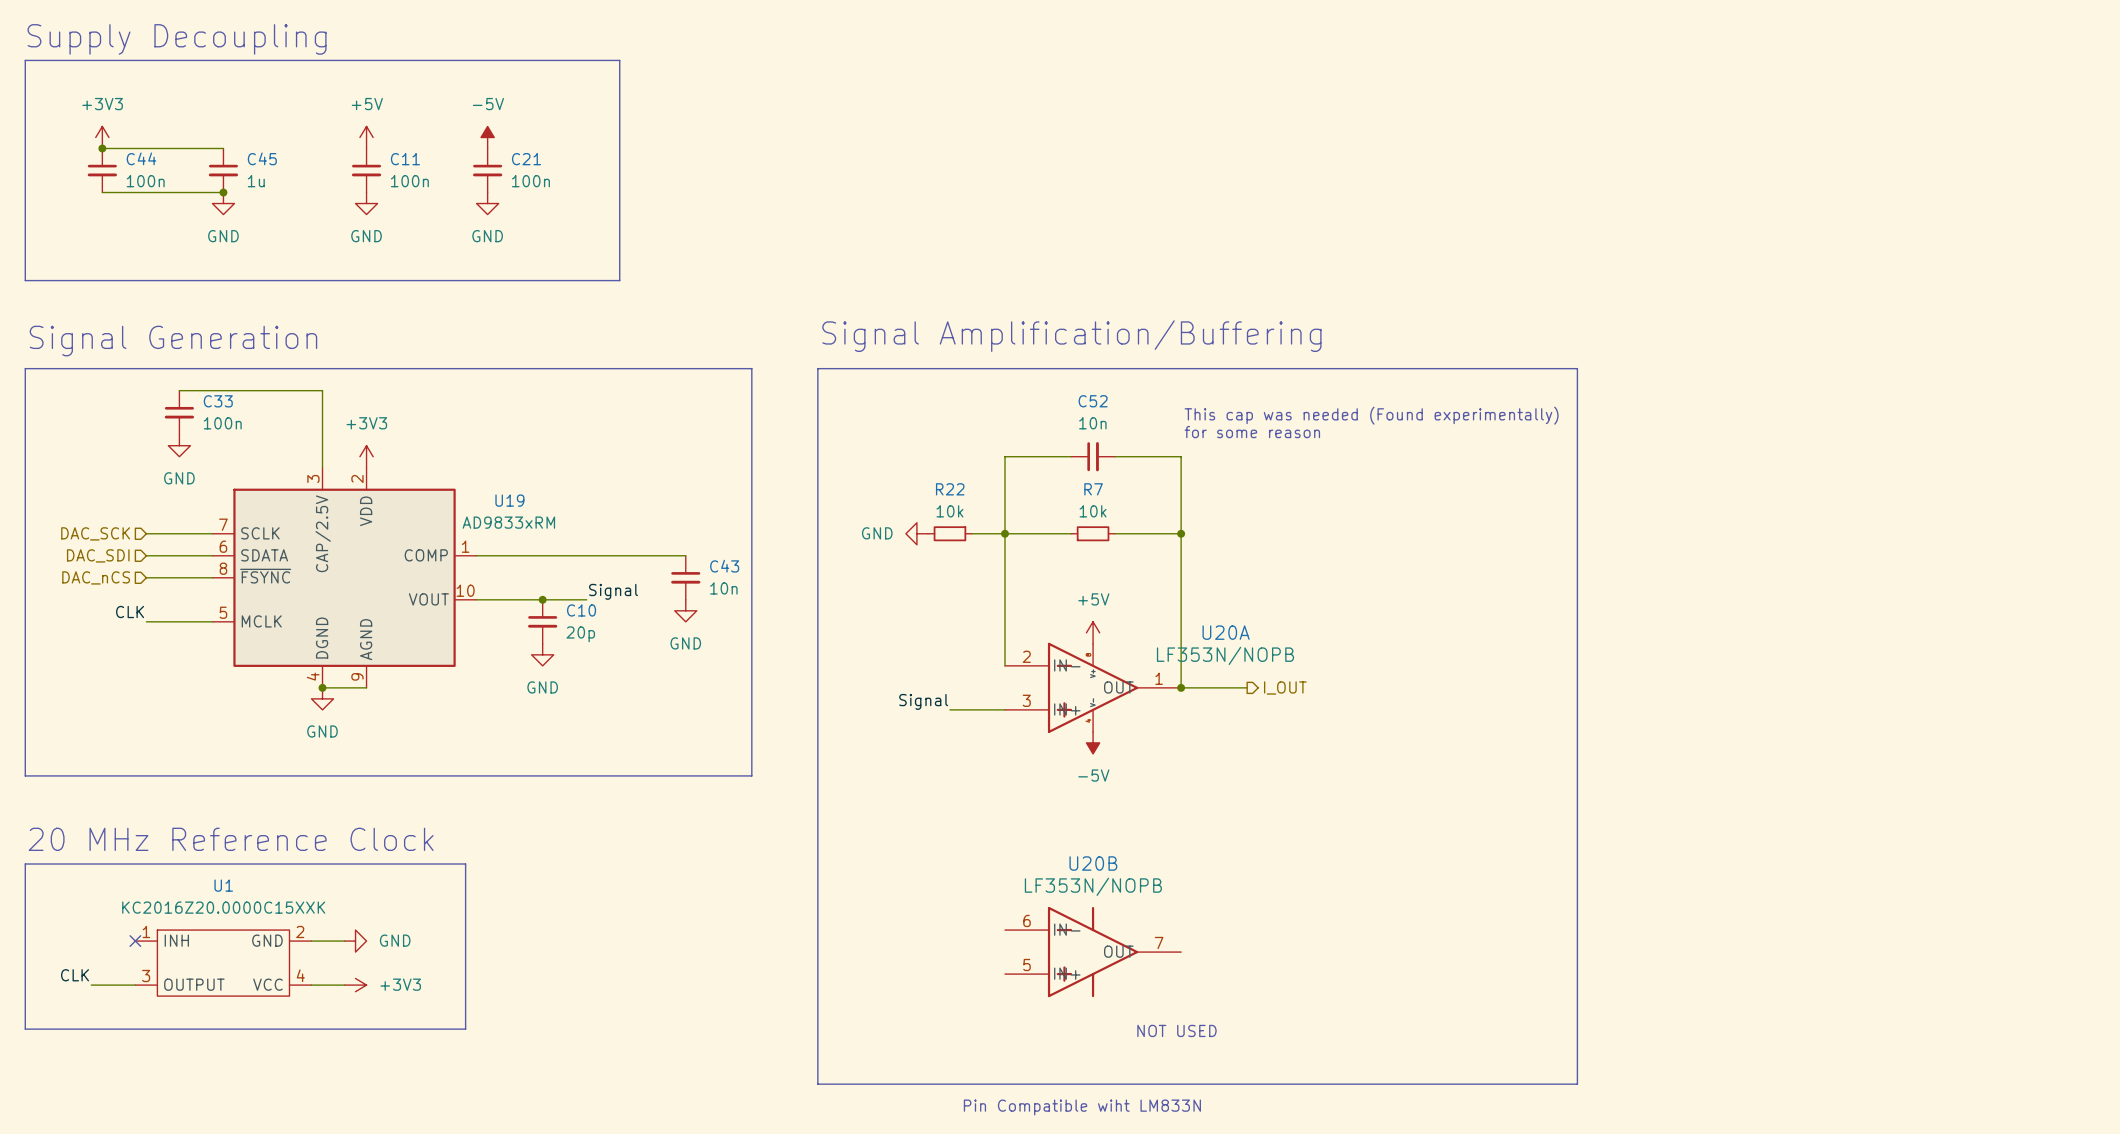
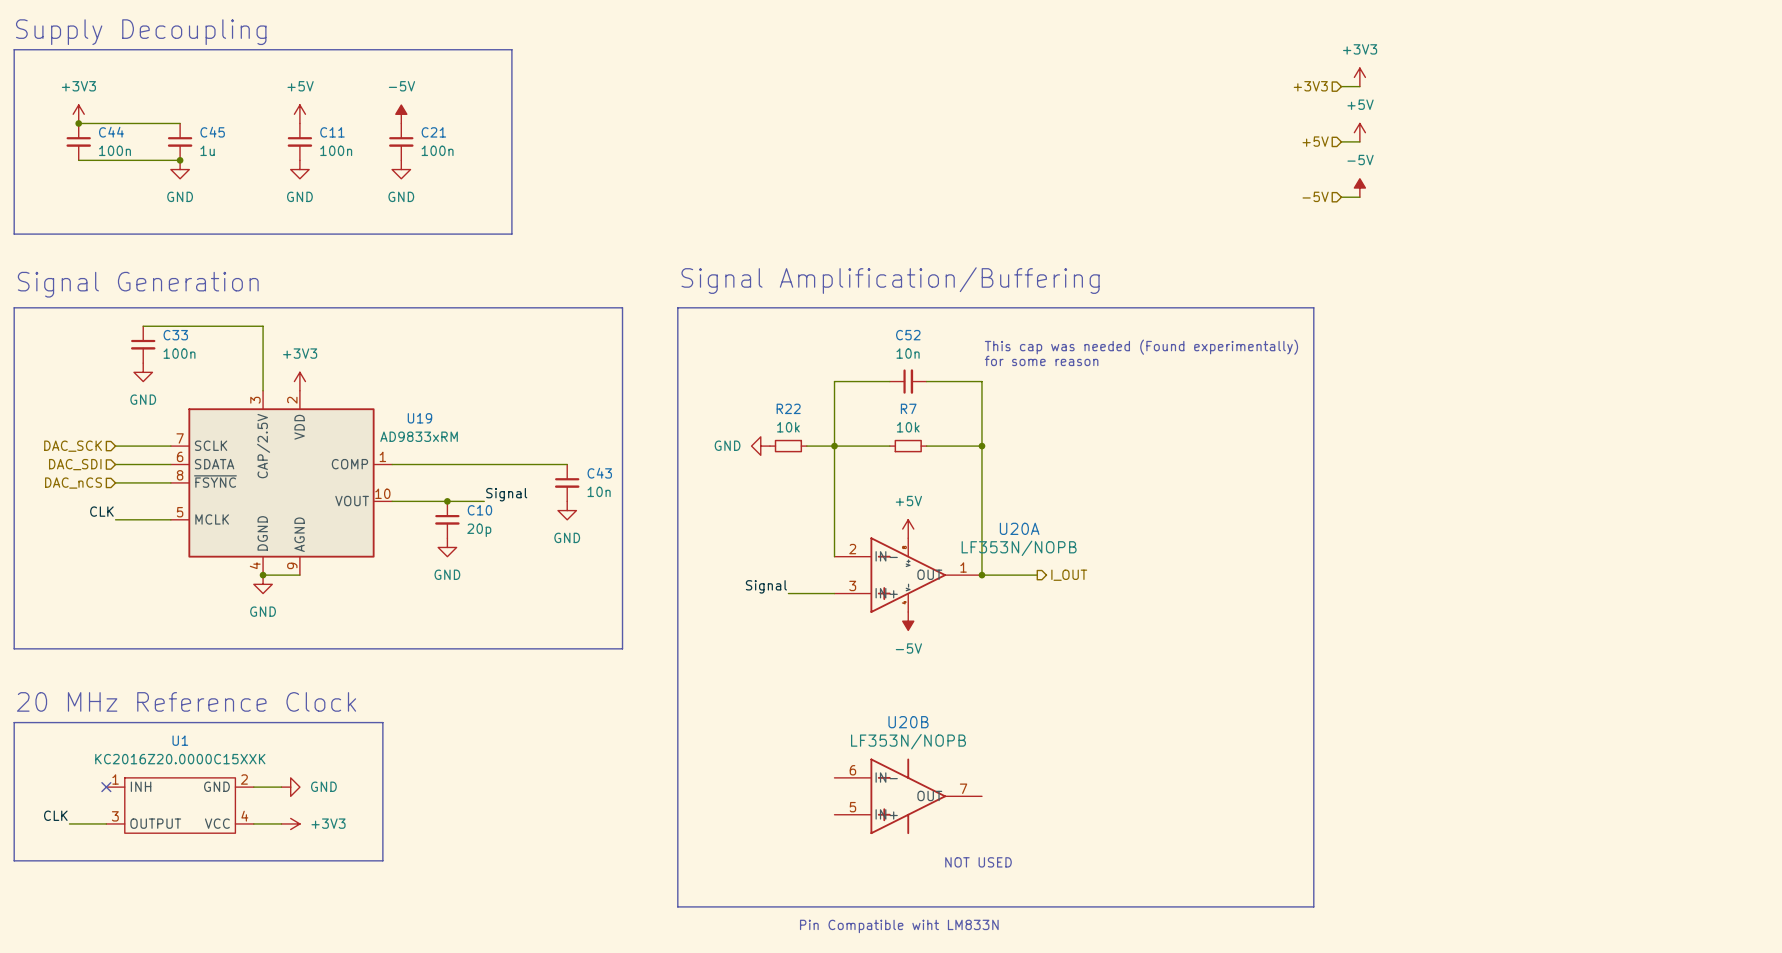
power symbol: none -> +3V3 (1359, 77)
hierarchical label: none -> +3V3 (1310, 86)
wire: none -> (1341, 86) (1359, 86)
power symbol: none -> +5V (1359, 132)
hierarchical label: none -> +5V (1315, 141)
wire: none -> (1341, 141) (1359, 141)
power symbol: none -> -5V (1359, 188)
hierarchical label: none -> -5V (1315, 196)
wire: none -> (1341, 197) (1359, 197)

